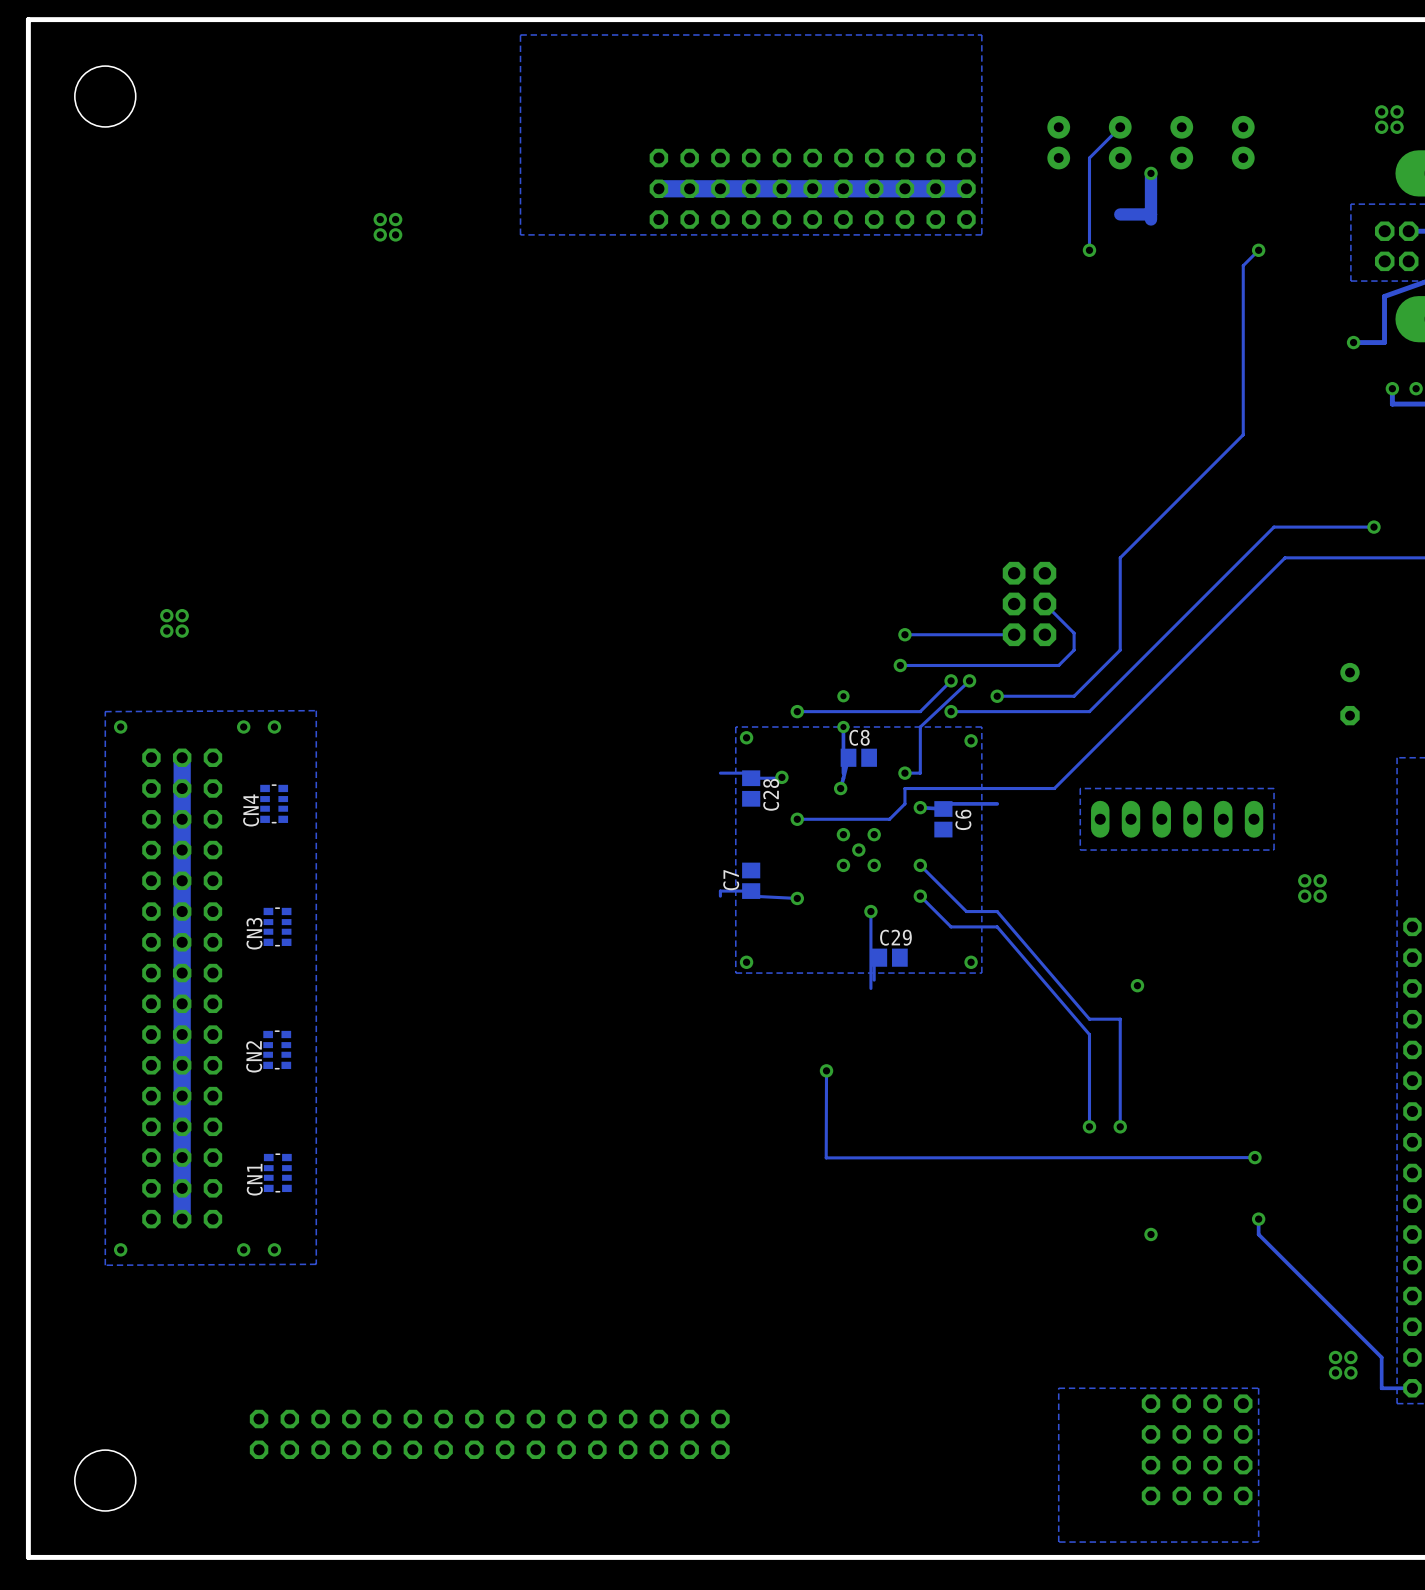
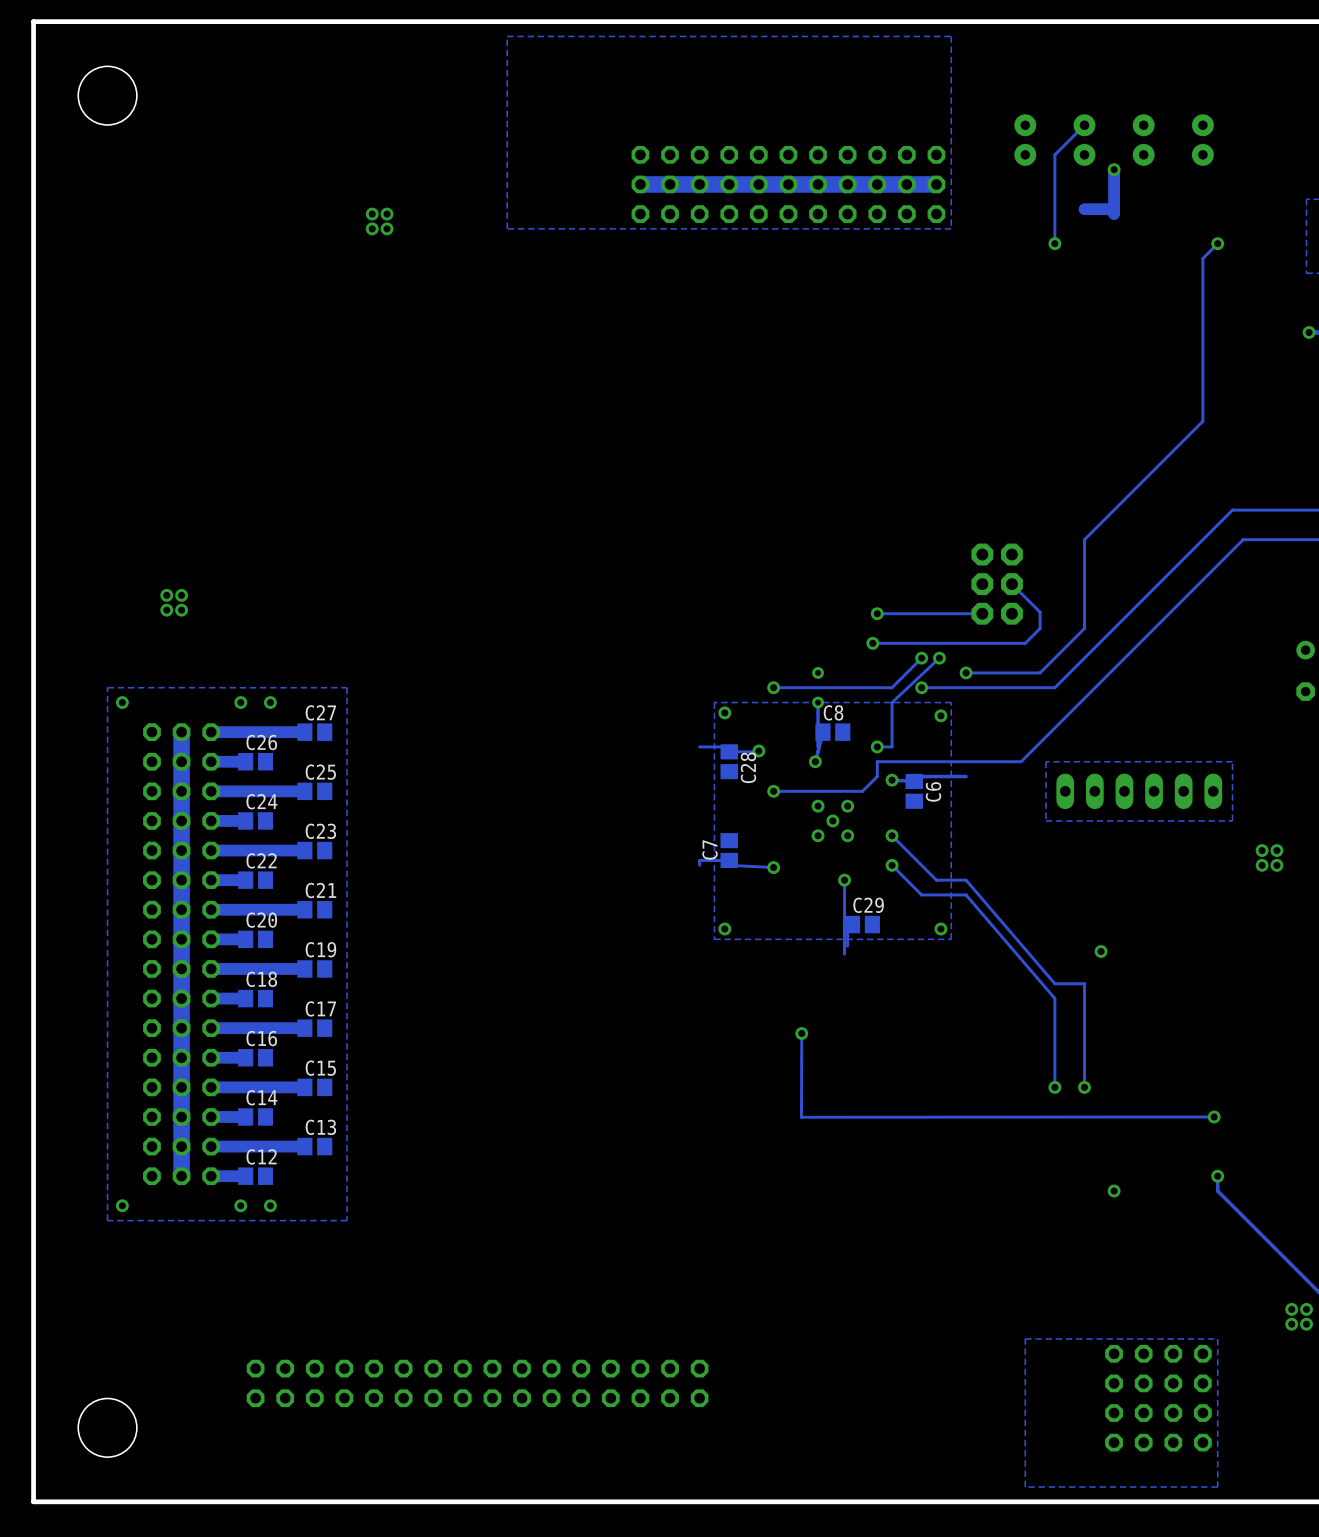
zone outline: (105, 711) (316, 710) (316, 1264) (105, 1265) -> (107, 687) (347, 687) (347, 1220) (107, 1220)
track: none -> (304, 732) (211, 732)
C27: none -> (314, 732)
track: none -> (245, 761) (211, 761)
C26: none -> (255, 761)
CN4: (274, 803) -> none
track: none -> (304, 791) (211, 791)
C25: none -> (314, 791)
track: none -> (245, 820) (211, 820)
C24: none -> (255, 820)
track: none -> (304, 850) (211, 850)
C23: none -> (314, 850)
track: none -> (245, 880) (211, 880)
C22: none -> (255, 880)
CN3: (277, 926) -> none
track: none -> (304, 909) (211, 909)
C21: none -> (314, 909)
track: none -> (245, 939) (211, 939)
C20: none -> (255, 939)
track: none -> (304, 968) (211, 968)
C19: none -> (314, 968)
track: none -> (245, 998) (211, 998)
C18: none -> (255, 998)
CN2: (277, 1049) -> none
track: none -> (304, 1028) (211, 1028)
C17: none -> (314, 1028)
track: none -> (245, 1057) (211, 1057)
C16: none -> (255, 1057)
track: none -> (304, 1087) (211, 1087)
C15: none -> (314, 1087)
track: none -> (245, 1116) (211, 1116)
C14: none -> (255, 1116)
CN1: (277, 1172) -> none
track: none -> (304, 1146) (211, 1146)
C13: none -> (314, 1146)
track: none -> (245, 1176) (211, 1176)
C12: none -> (255, 1176)

